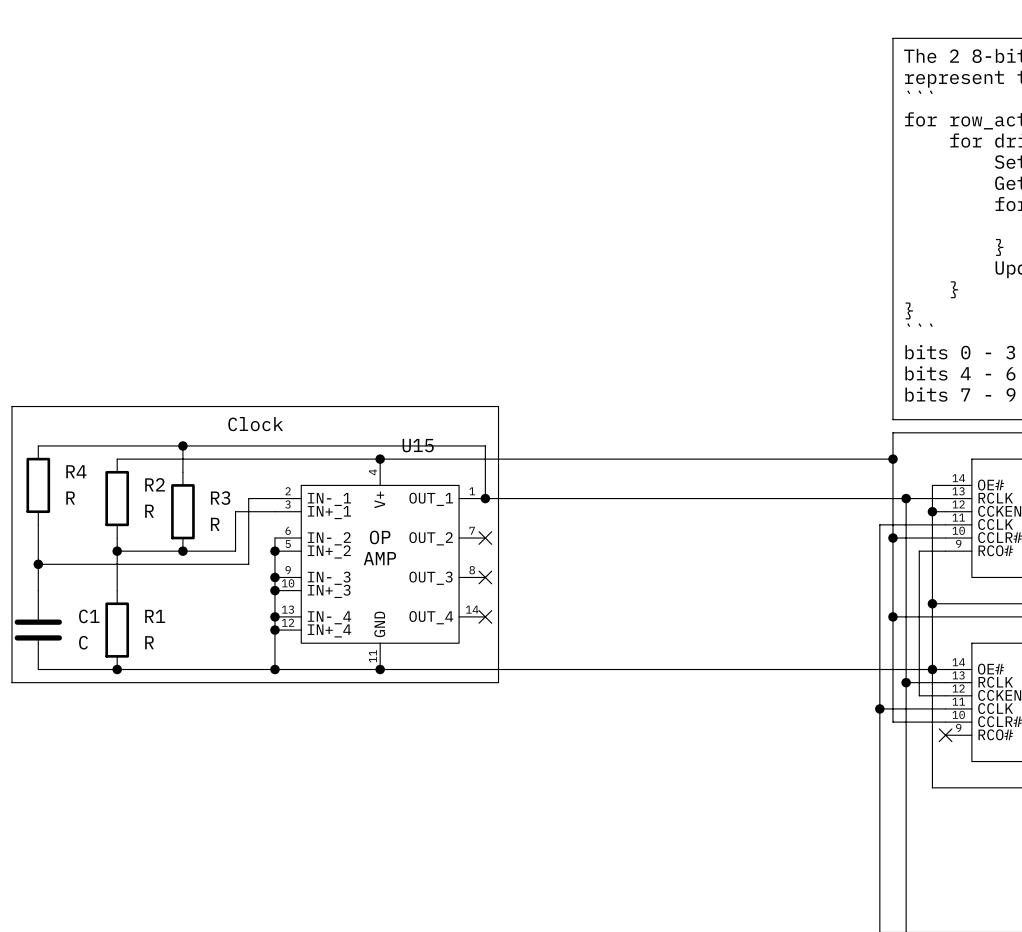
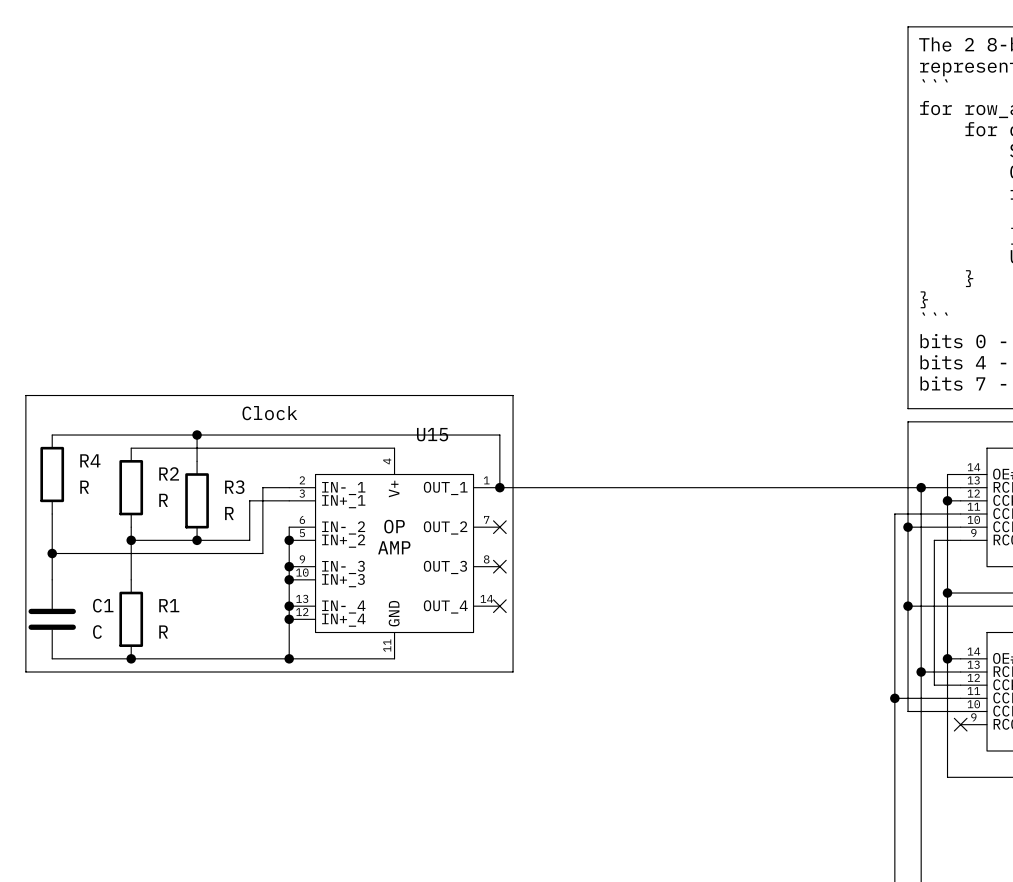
wire: (380, 459) (892, 459) -> none
junction: (380, 459) -> none
junction: (892, 459) -> none
wire: (380, 669) (932, 669) -> none
junction: (380, 669) -> none

